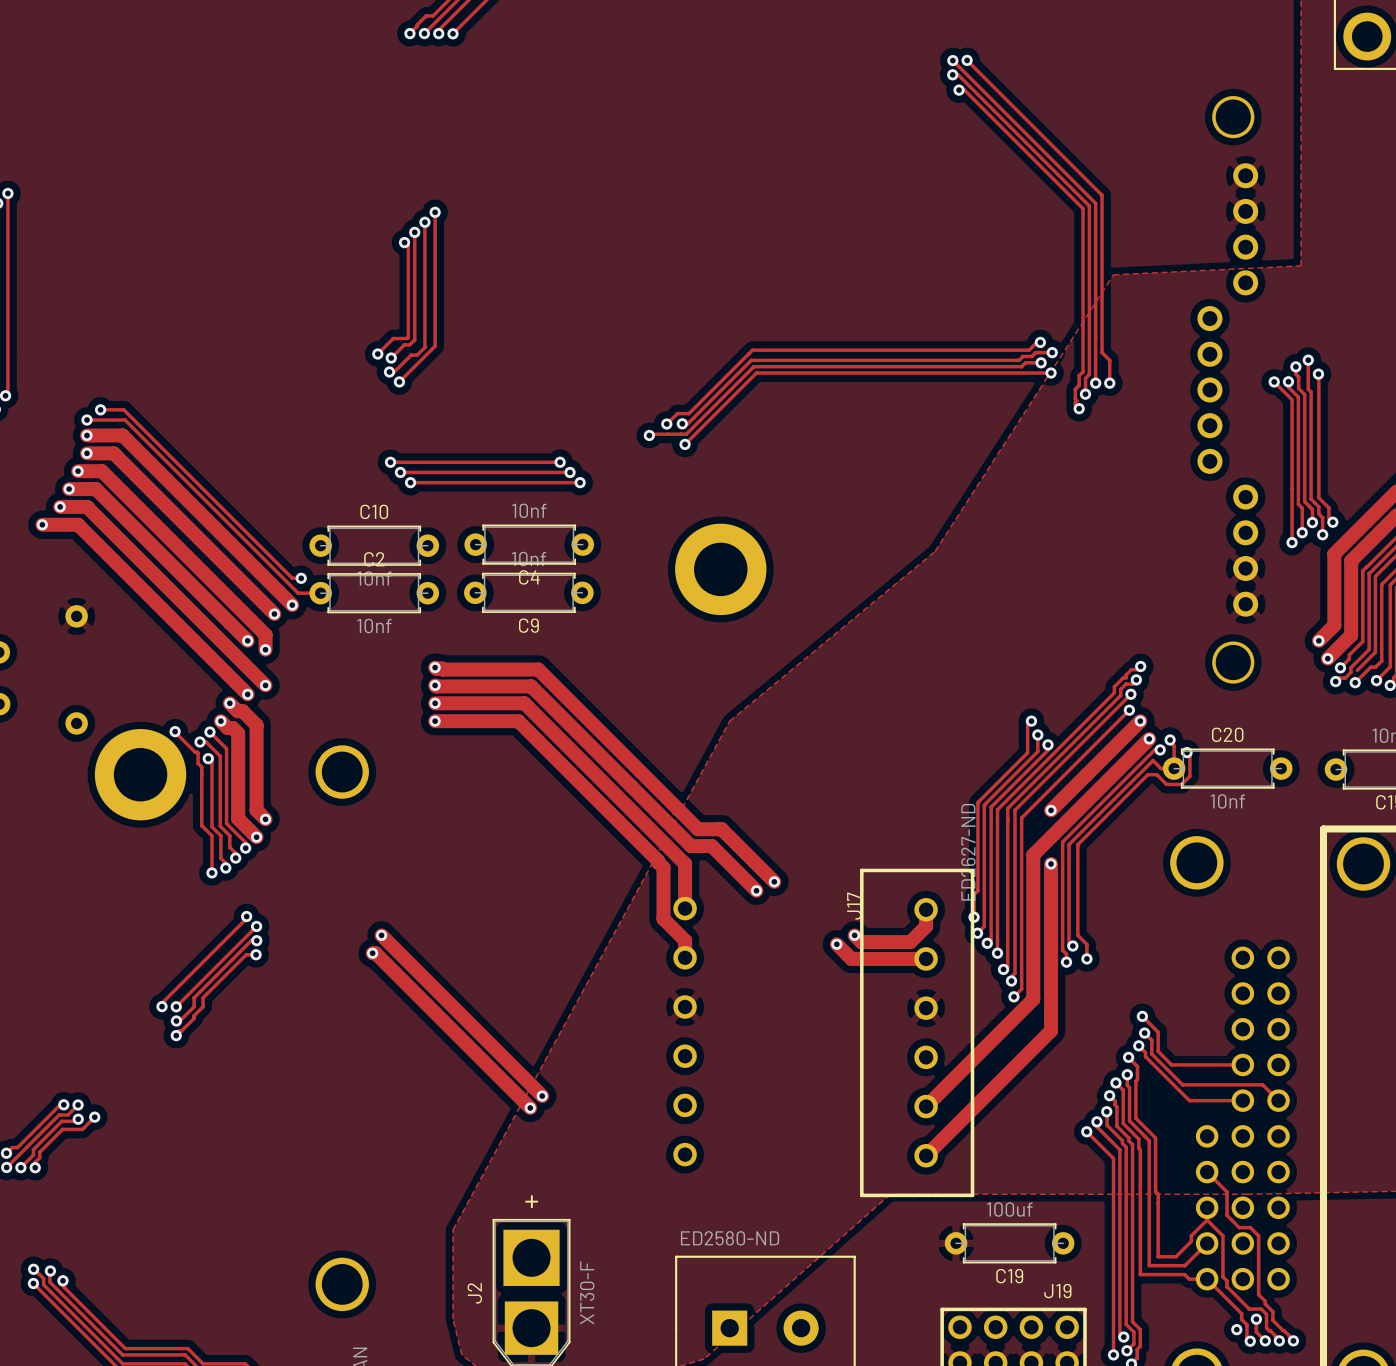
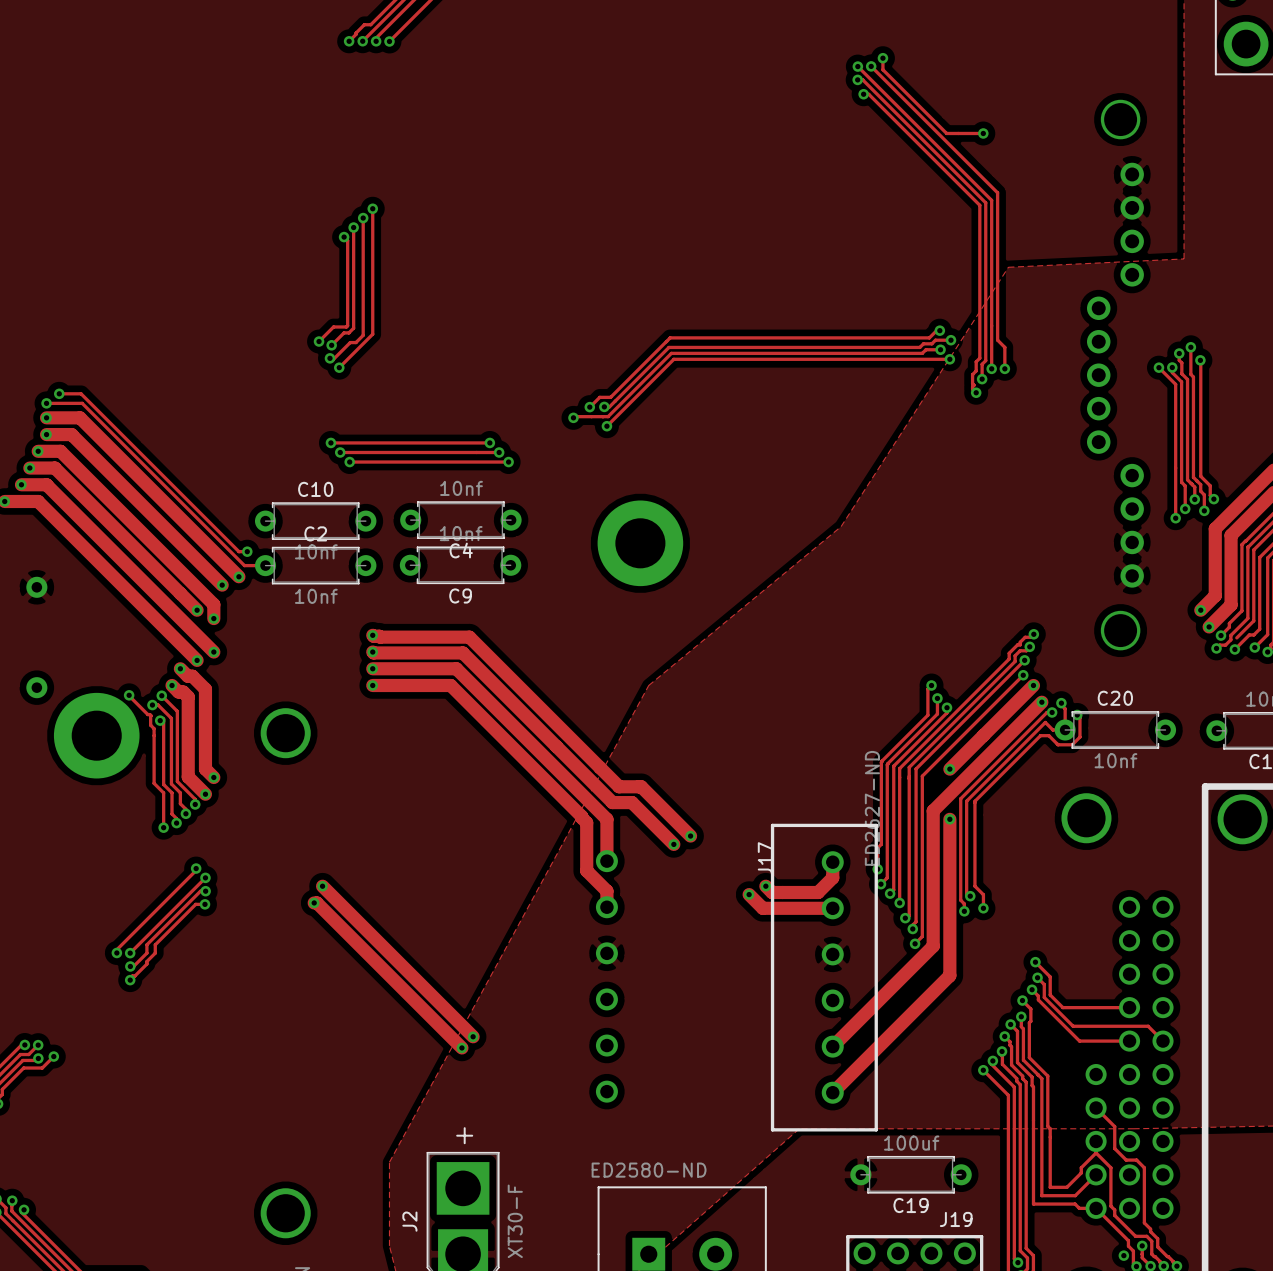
track: none -> (882, 58) (882, 69) (946, 133) (983, 133)
via: none -> (882, 58)
via: none -> (983, 133)

